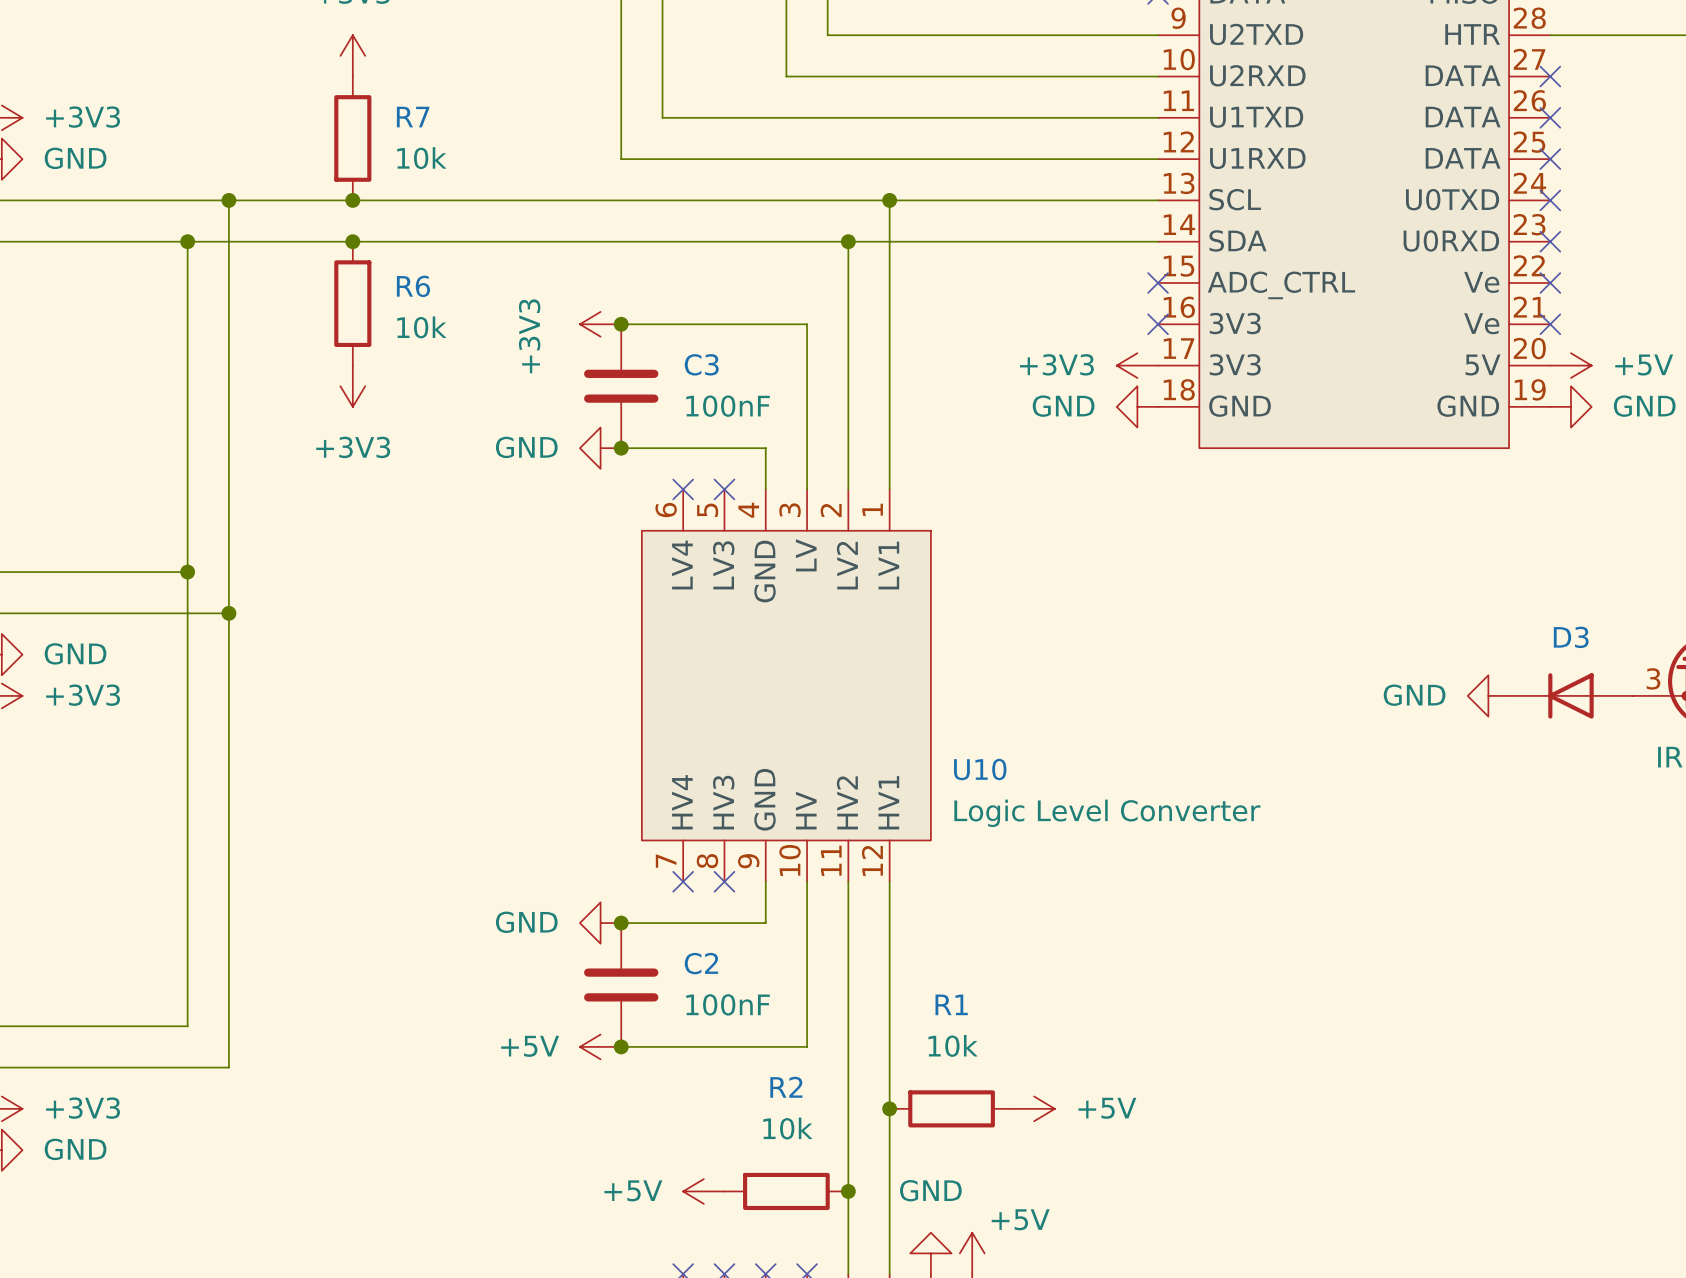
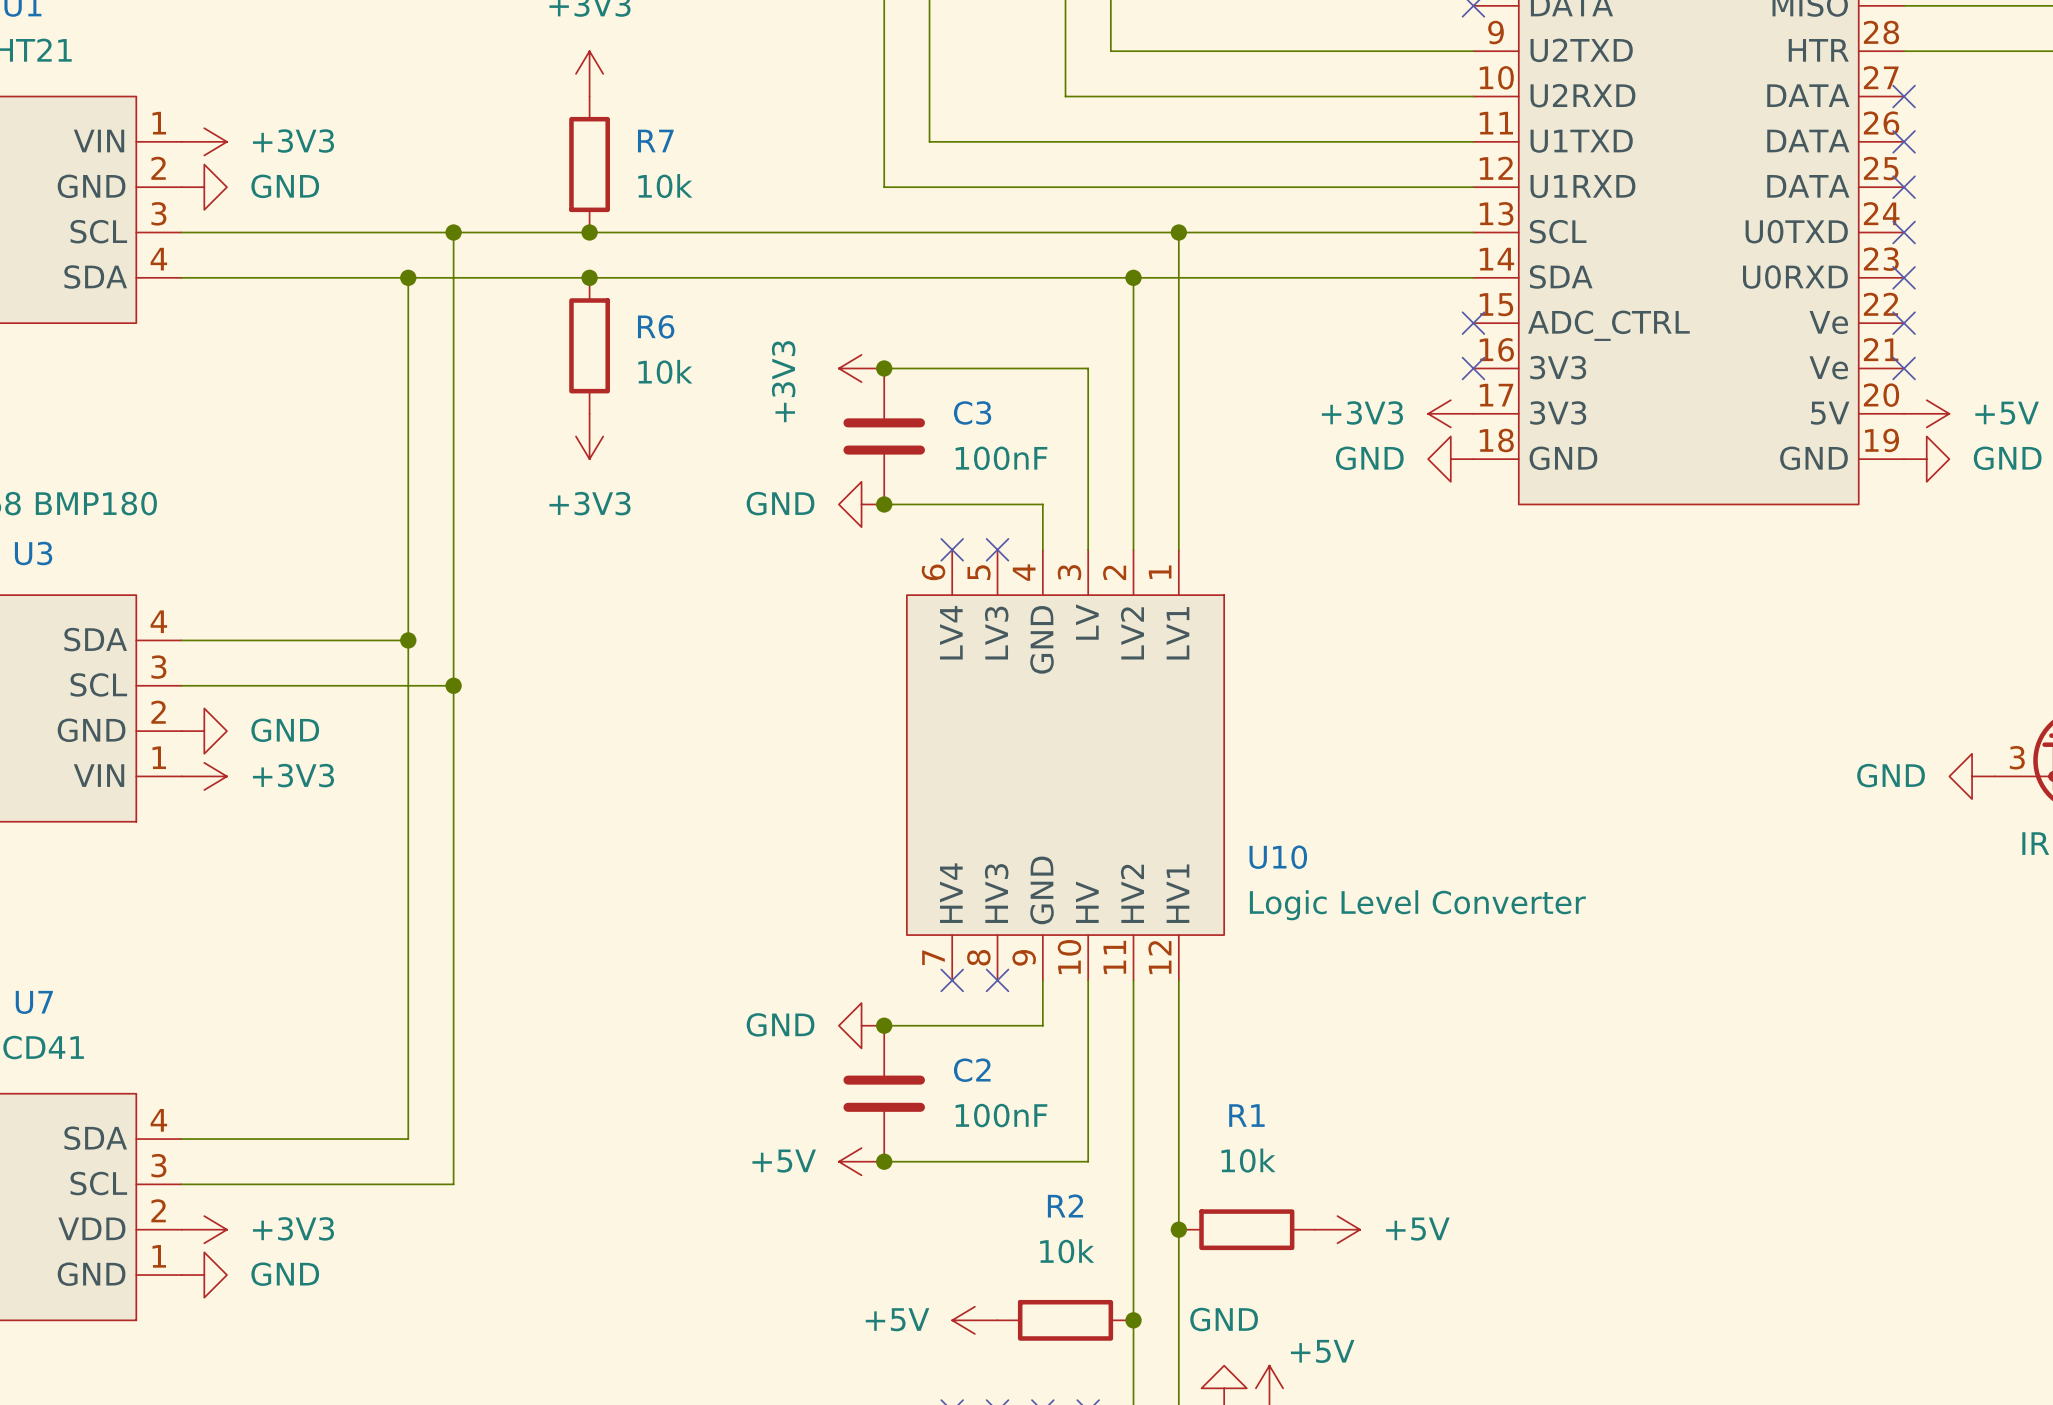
power symbol position: GND (1488, 695) -> GND (1972, 776)
D3: (1570, 695) -> none

